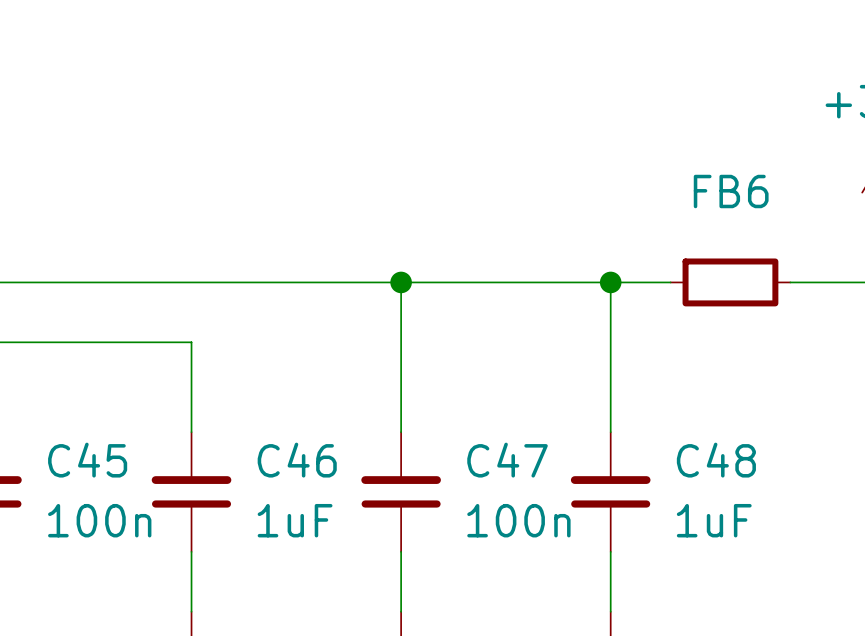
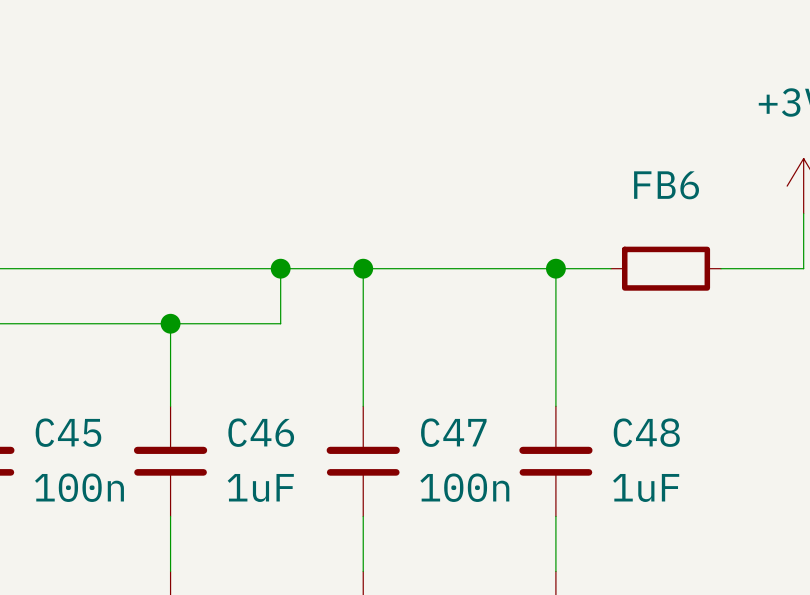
wire: none -> (280, 268) (280, 323) (170, 323)
junction: none -> (280, 268)
junction: none -> (170, 323)

